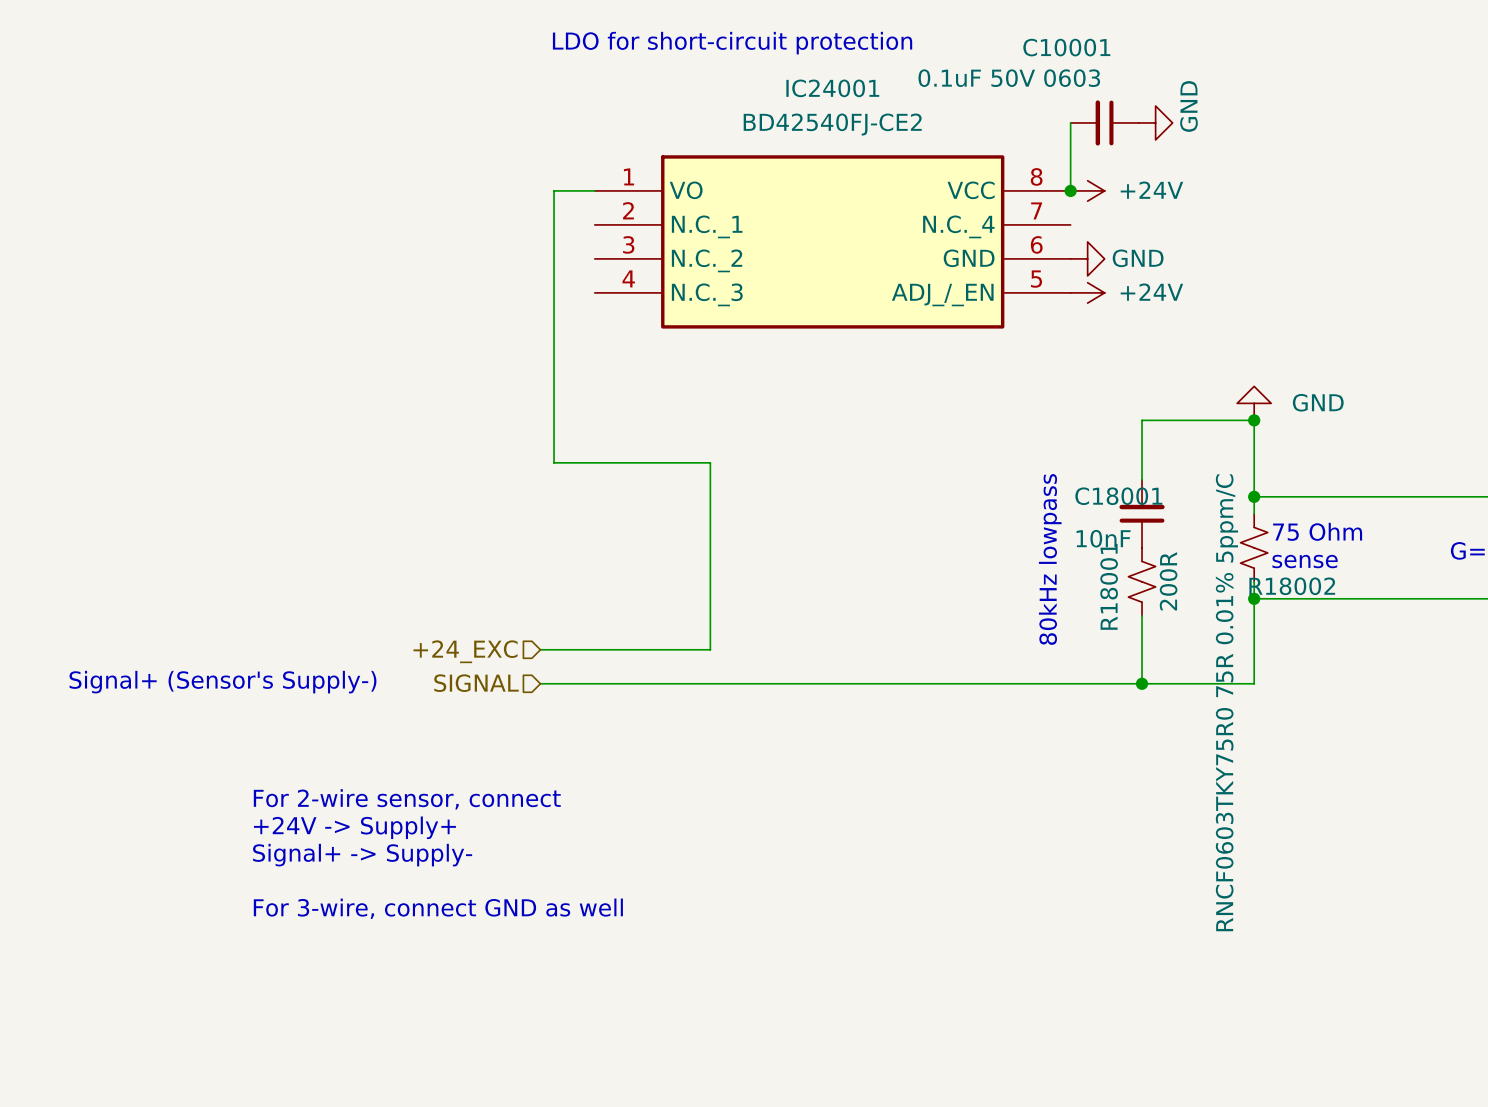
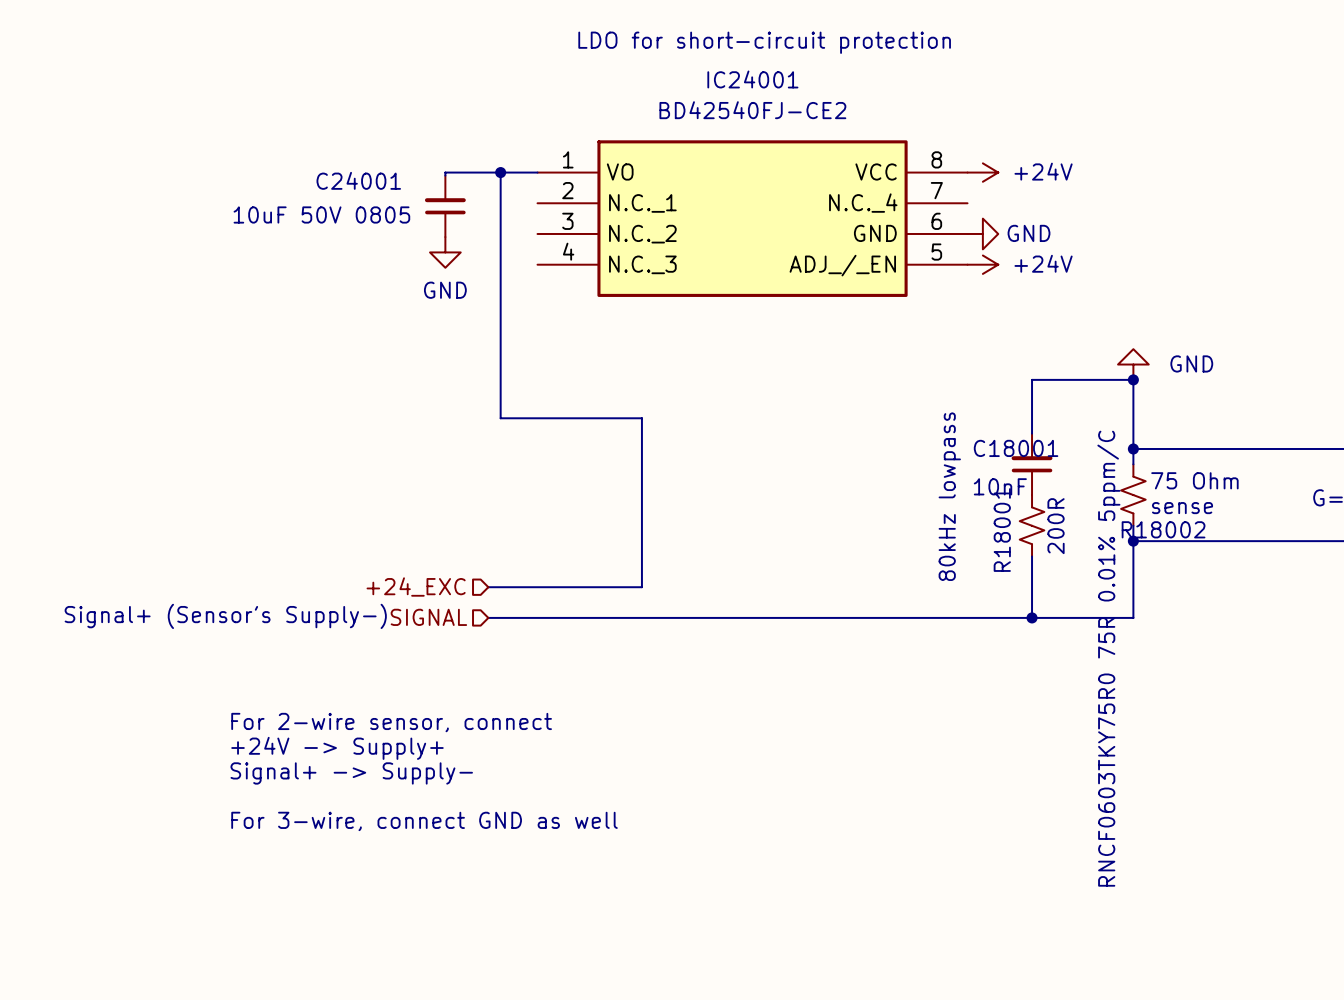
text position: LDO for short-circuit protection (732, 43) -> LDO for short-circuit protection (764, 42)
wire: (1070, 122) (1070, 190) -> none
C10001: 0.1uF 50V 0603 (1104, 122) -> none
power symbol: GND (1155, 122) -> none
wire: none -> (500, 172) (445, 172) (445, 175)
junction: none -> (500, 172)
junction: (1070, 190) -> none
C24001: none -> 10uF 50V 0805 (445, 206)
power symbol: none -> GND (445, 252)

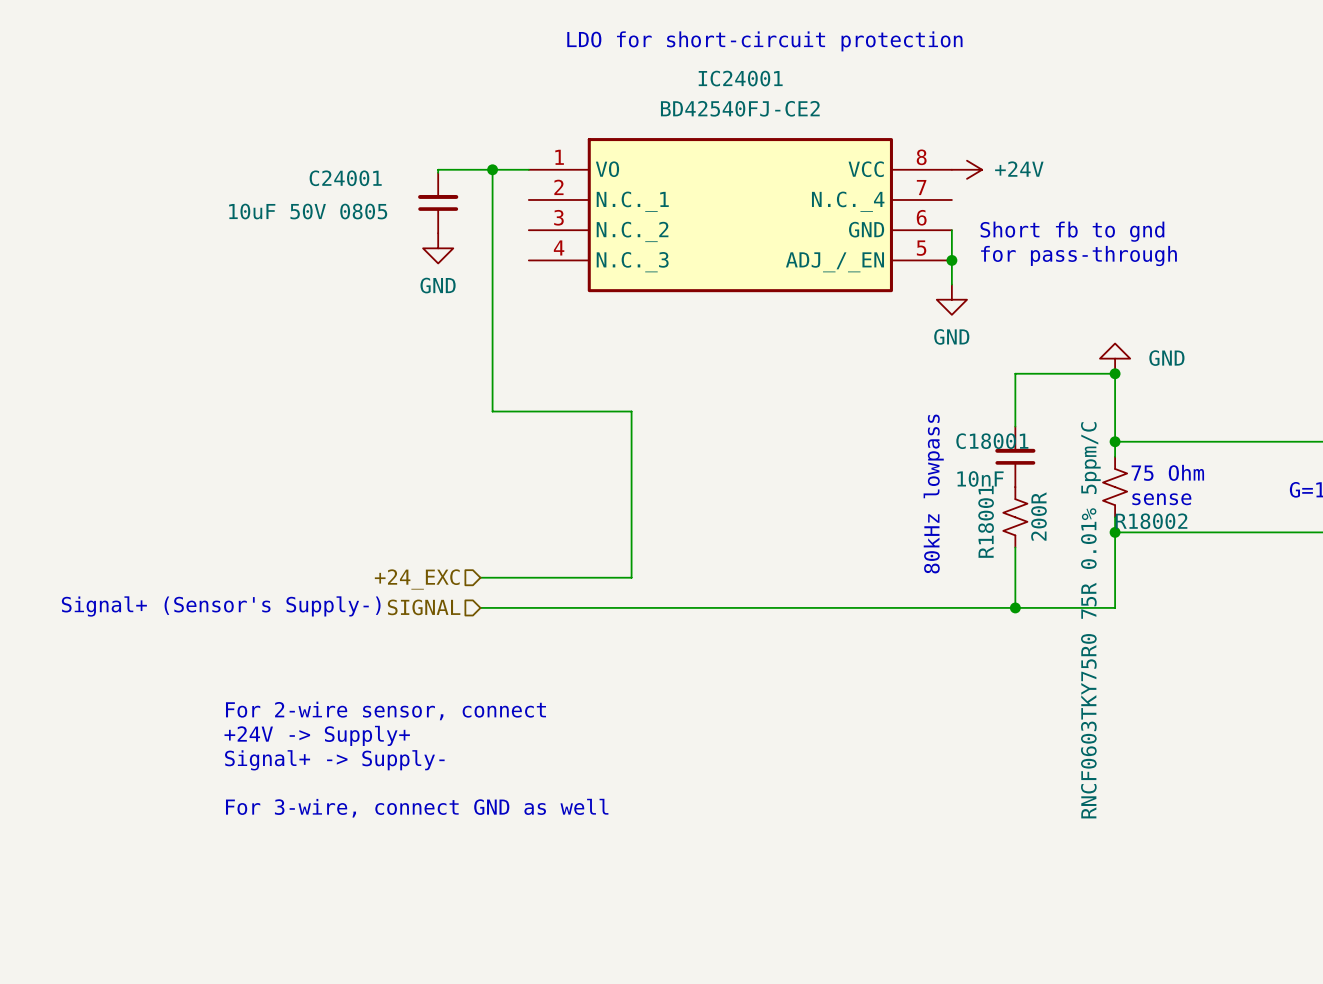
wire: none -> (951, 230) (951, 284)
power symbol rotation: 0° (982, 233) -> 90° clockwise (951, 299)
power symbol position: GND (982, 233) -> GND (951, 299)
text: none -> Short fb to gnd (1072, 231)
text: none -> for pass-through (1078, 256)
junction: none -> (951, 260)
power symbol: +24V (982, 264) -> none

